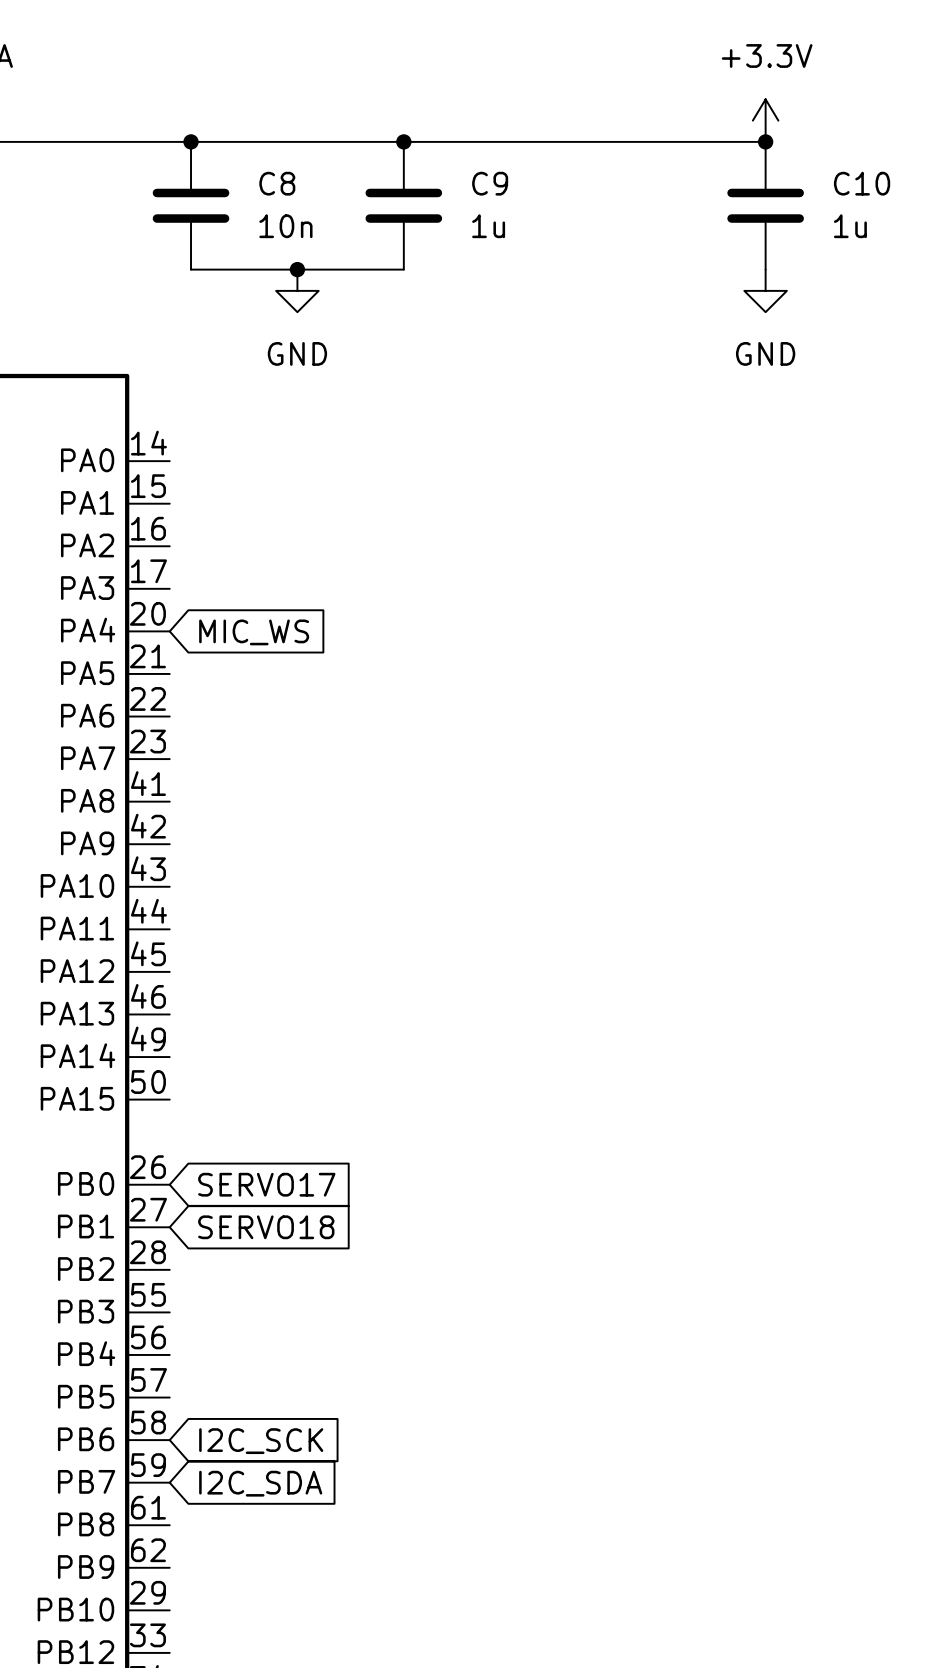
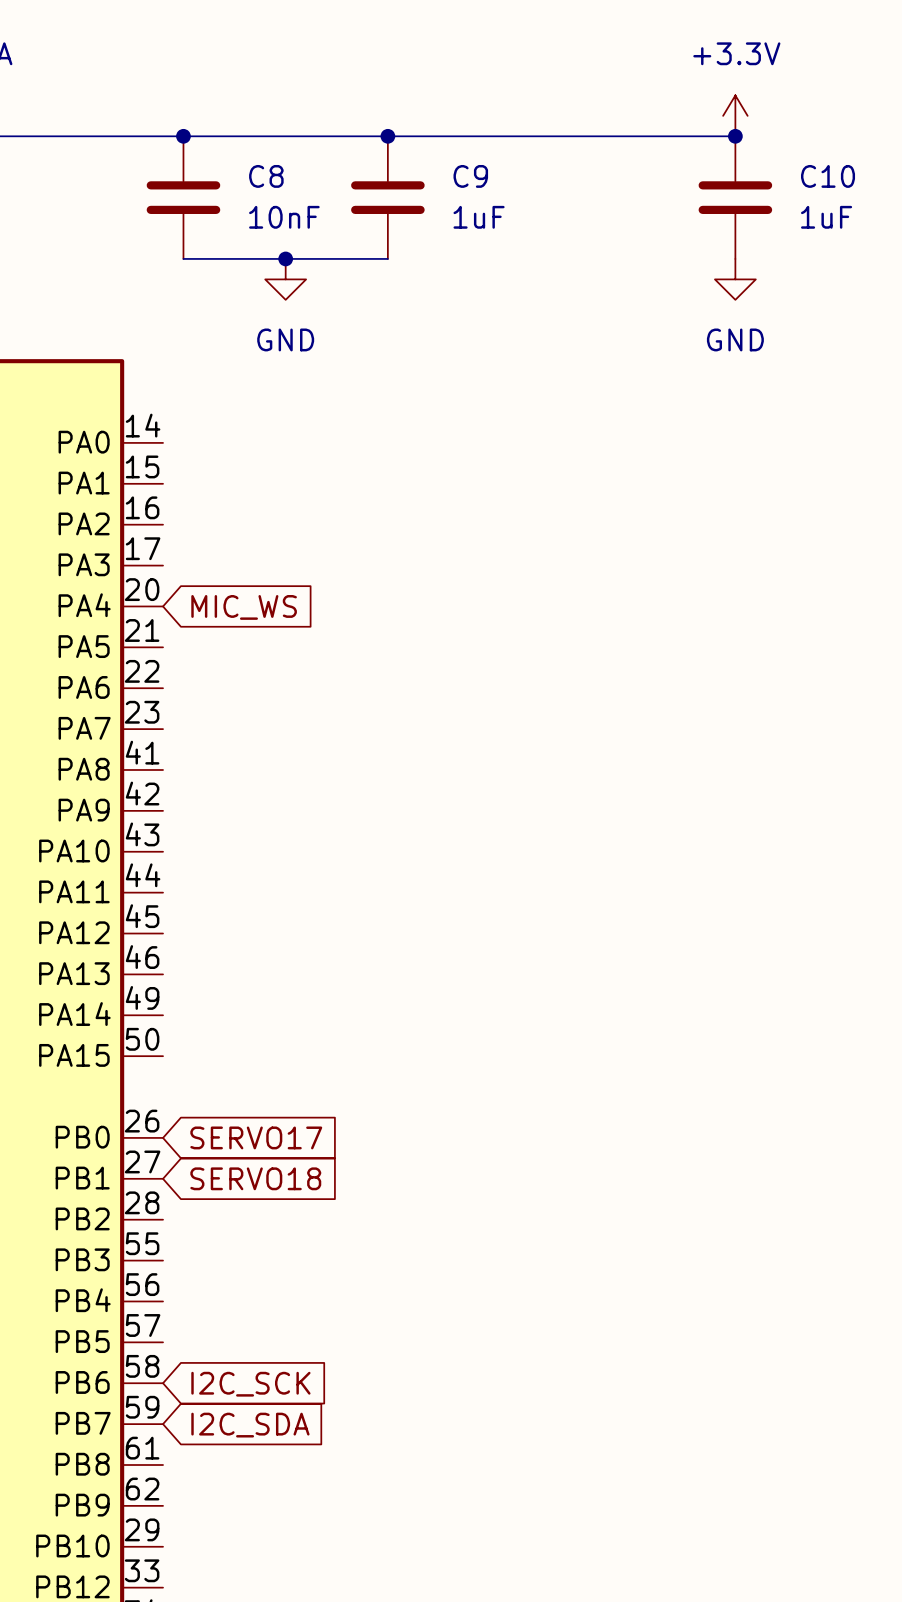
C8 value: 10n (285, 226) -> 10nF (284, 217)
C9 value: 1u (488, 226) -> 1uF (479, 217)
C10 value: 1u (850, 226) -> 1uF (826, 217)

